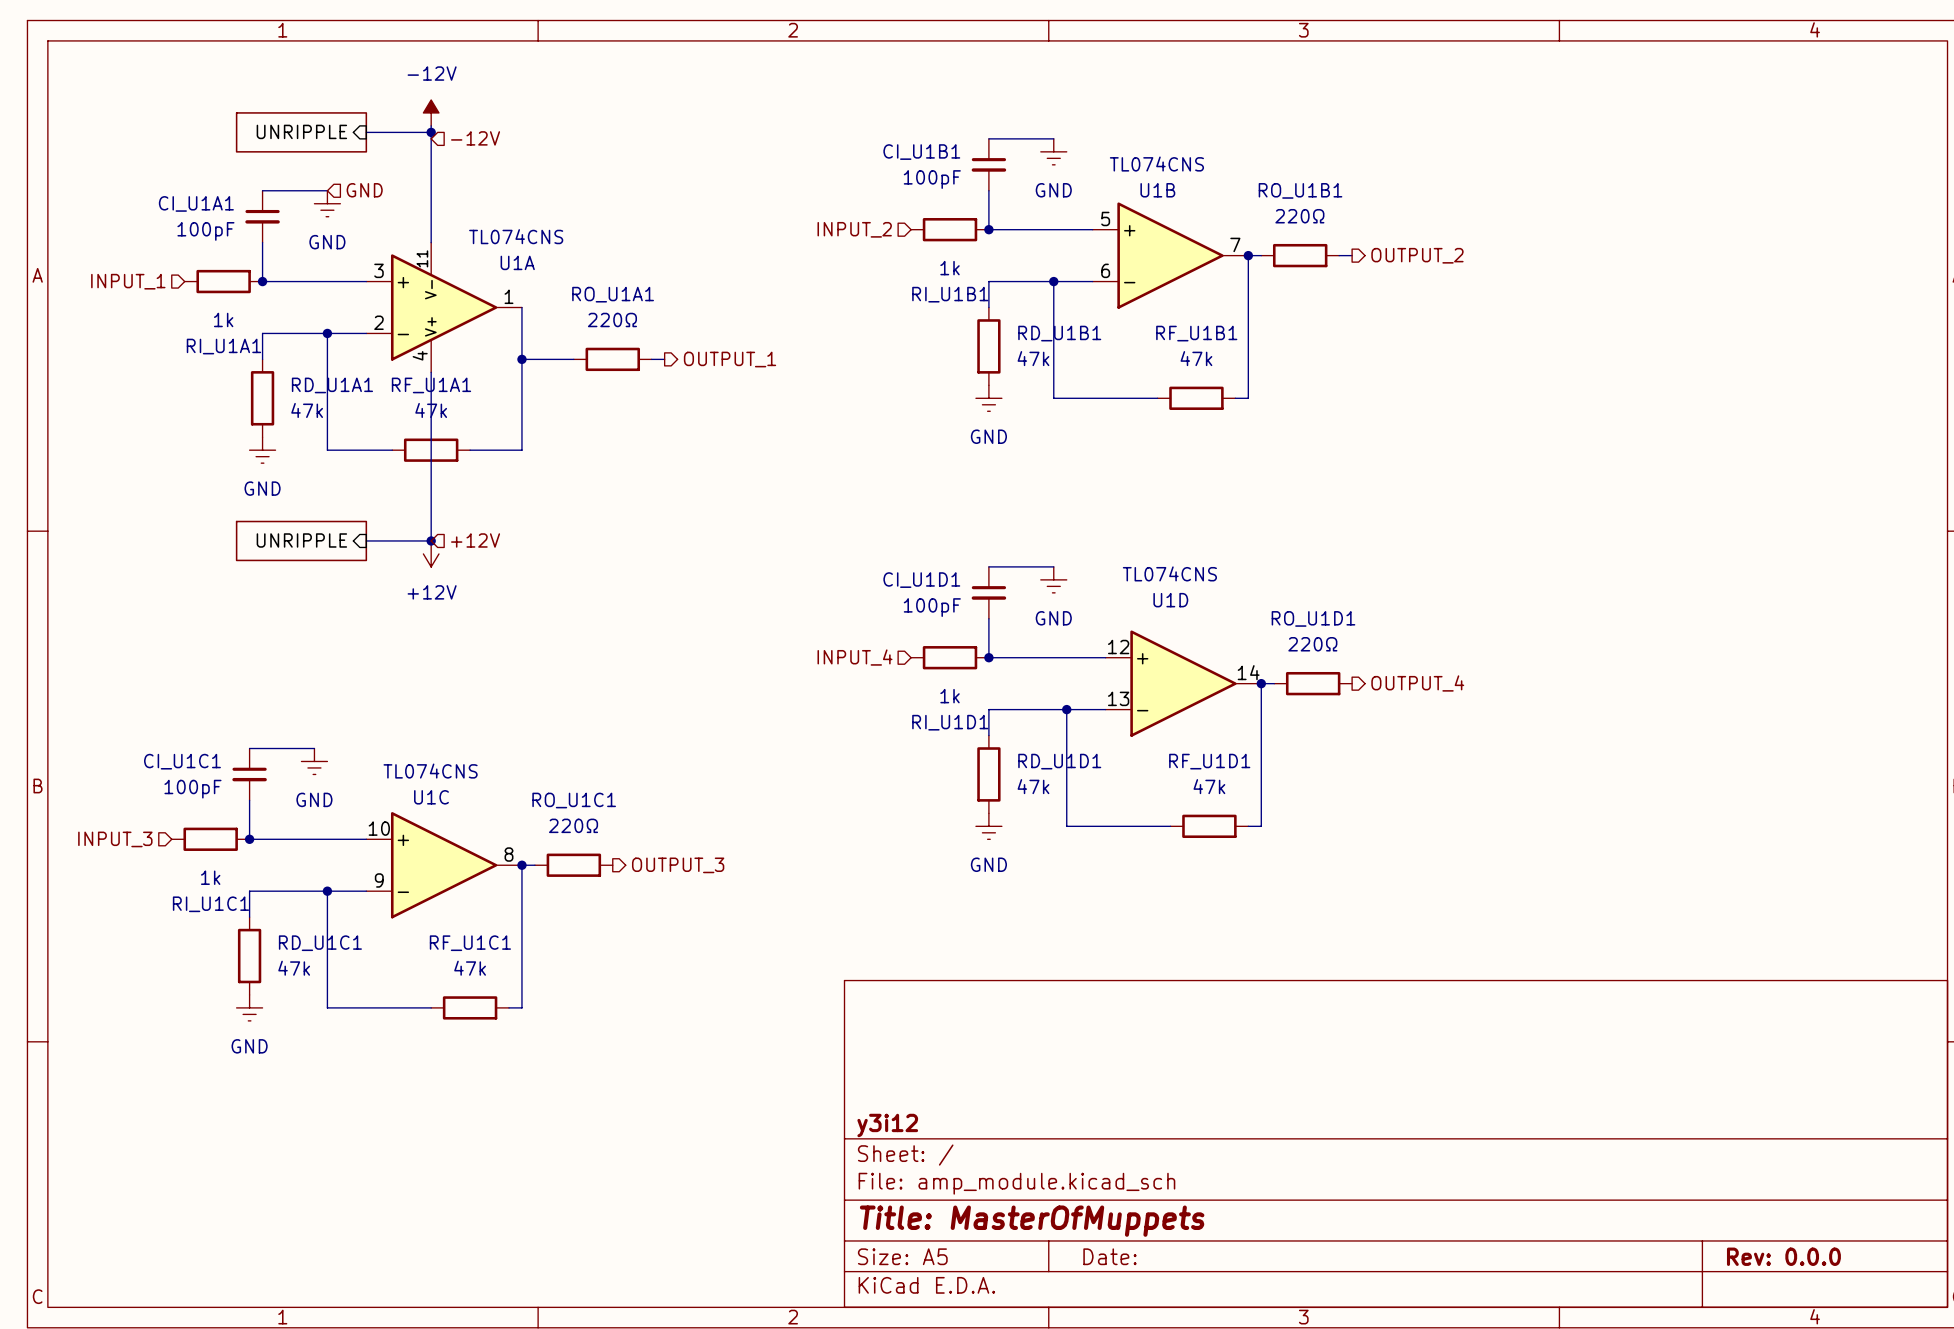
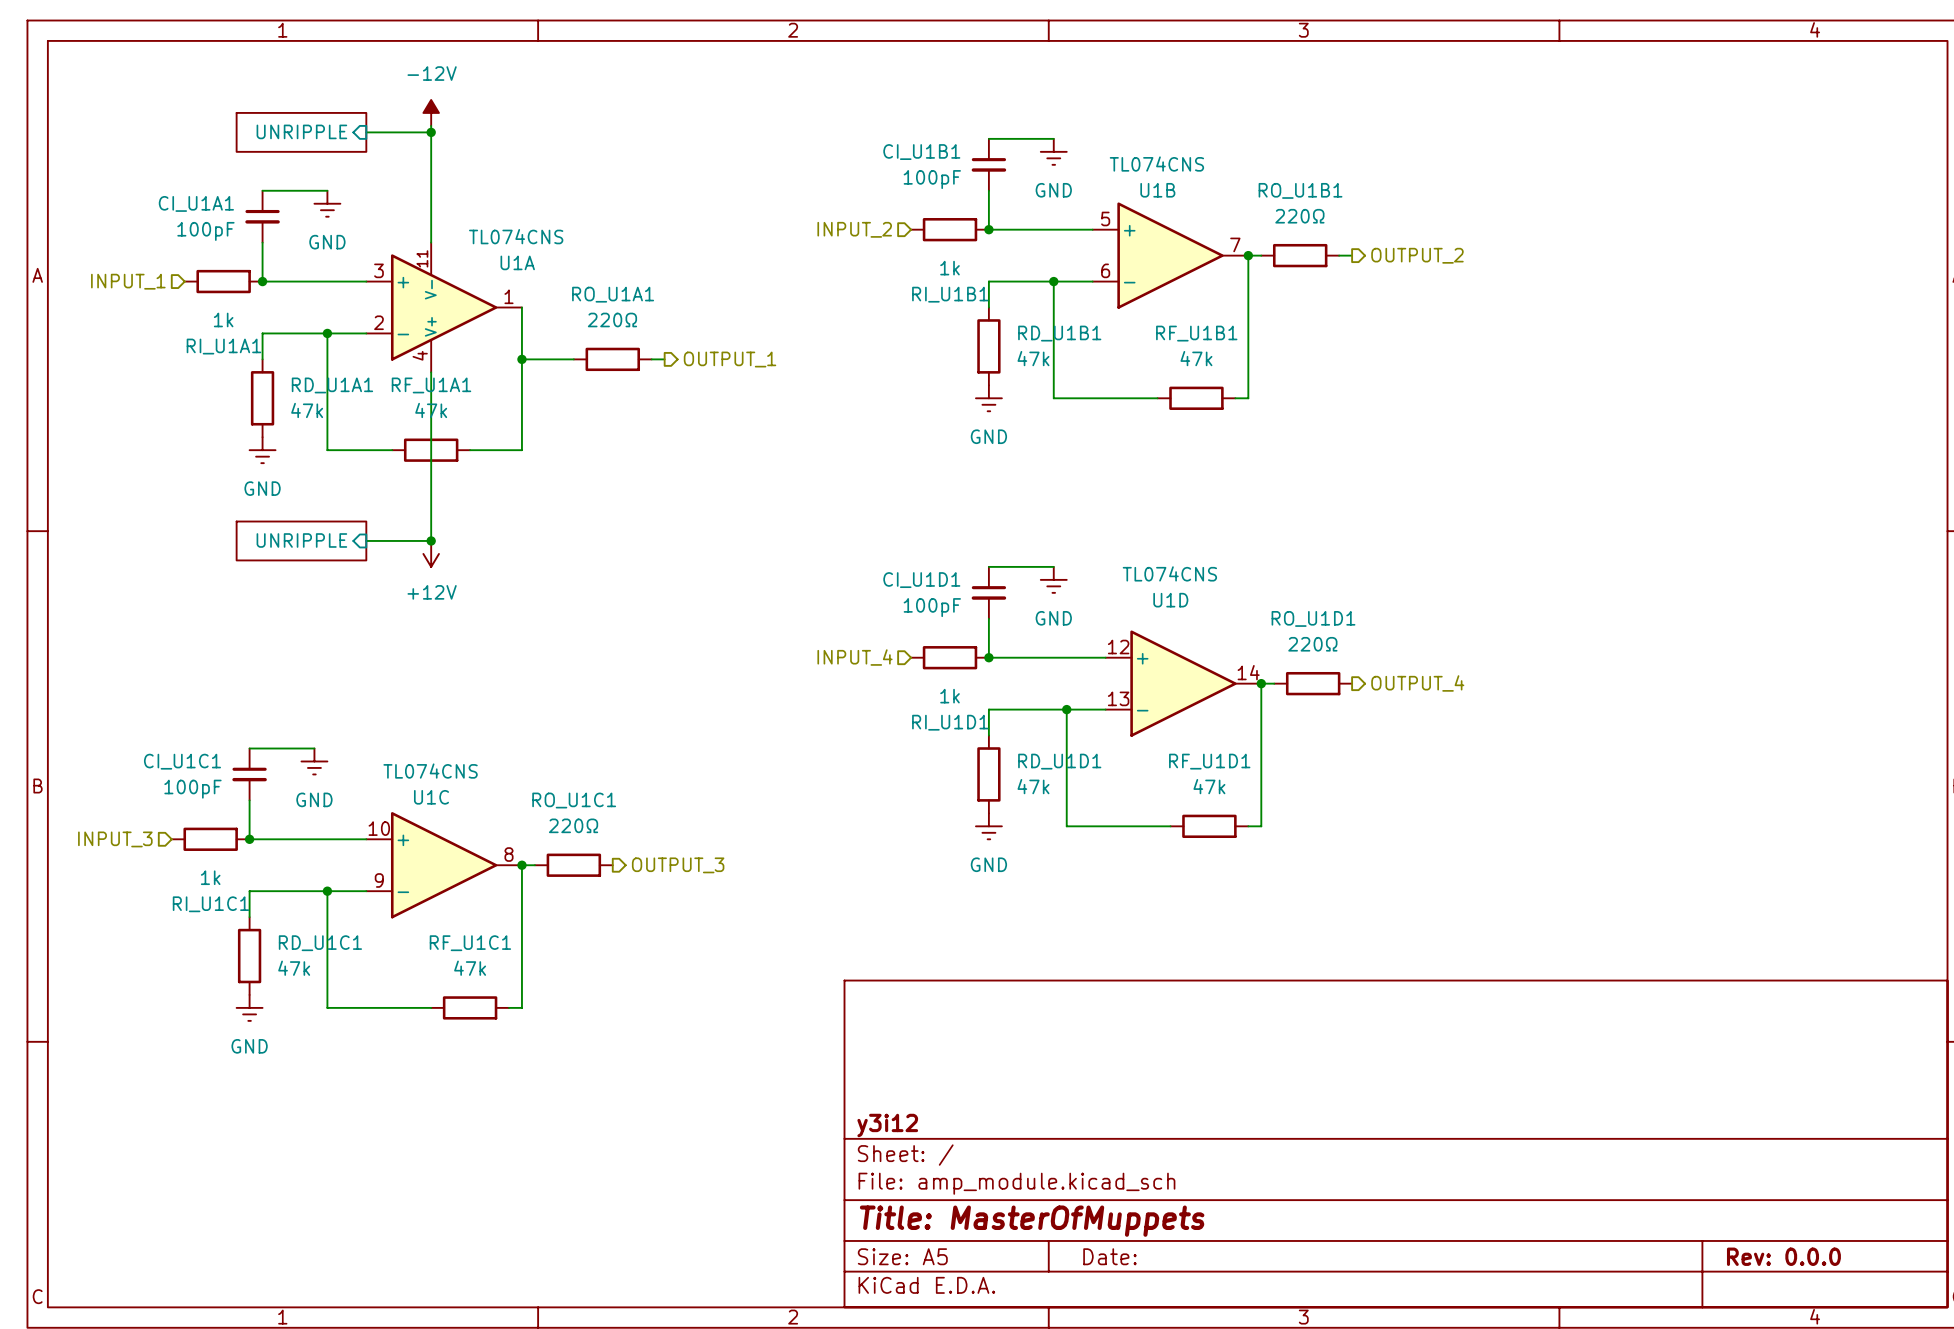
hierarchical label: -12V (475, 138) -> none
hierarchical label: GND (364, 190) -> none
hierarchical label: +12V (475, 540) -> none

